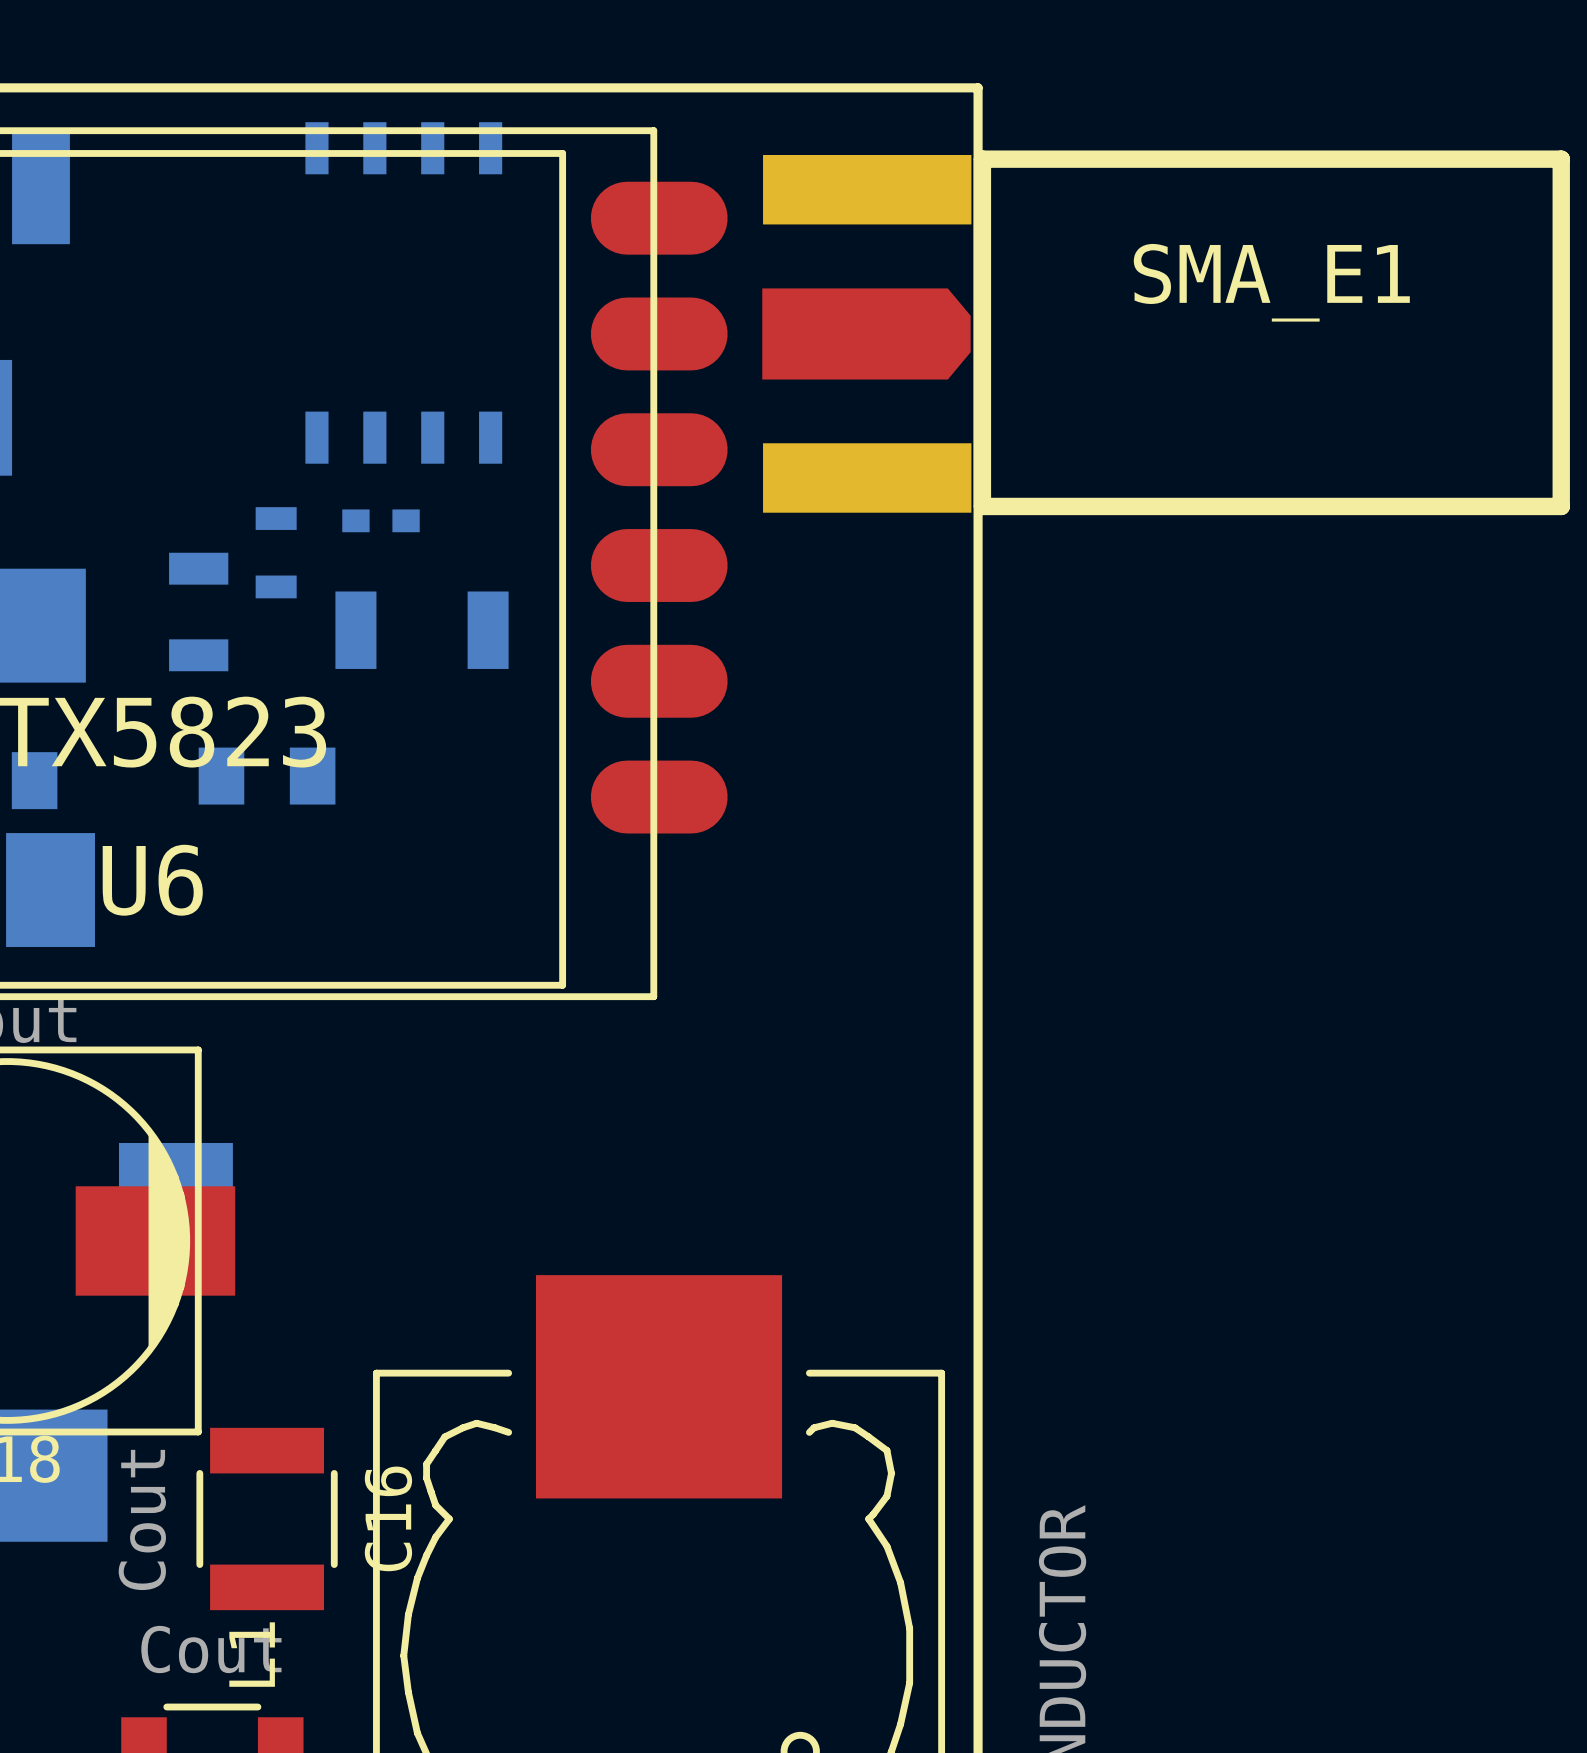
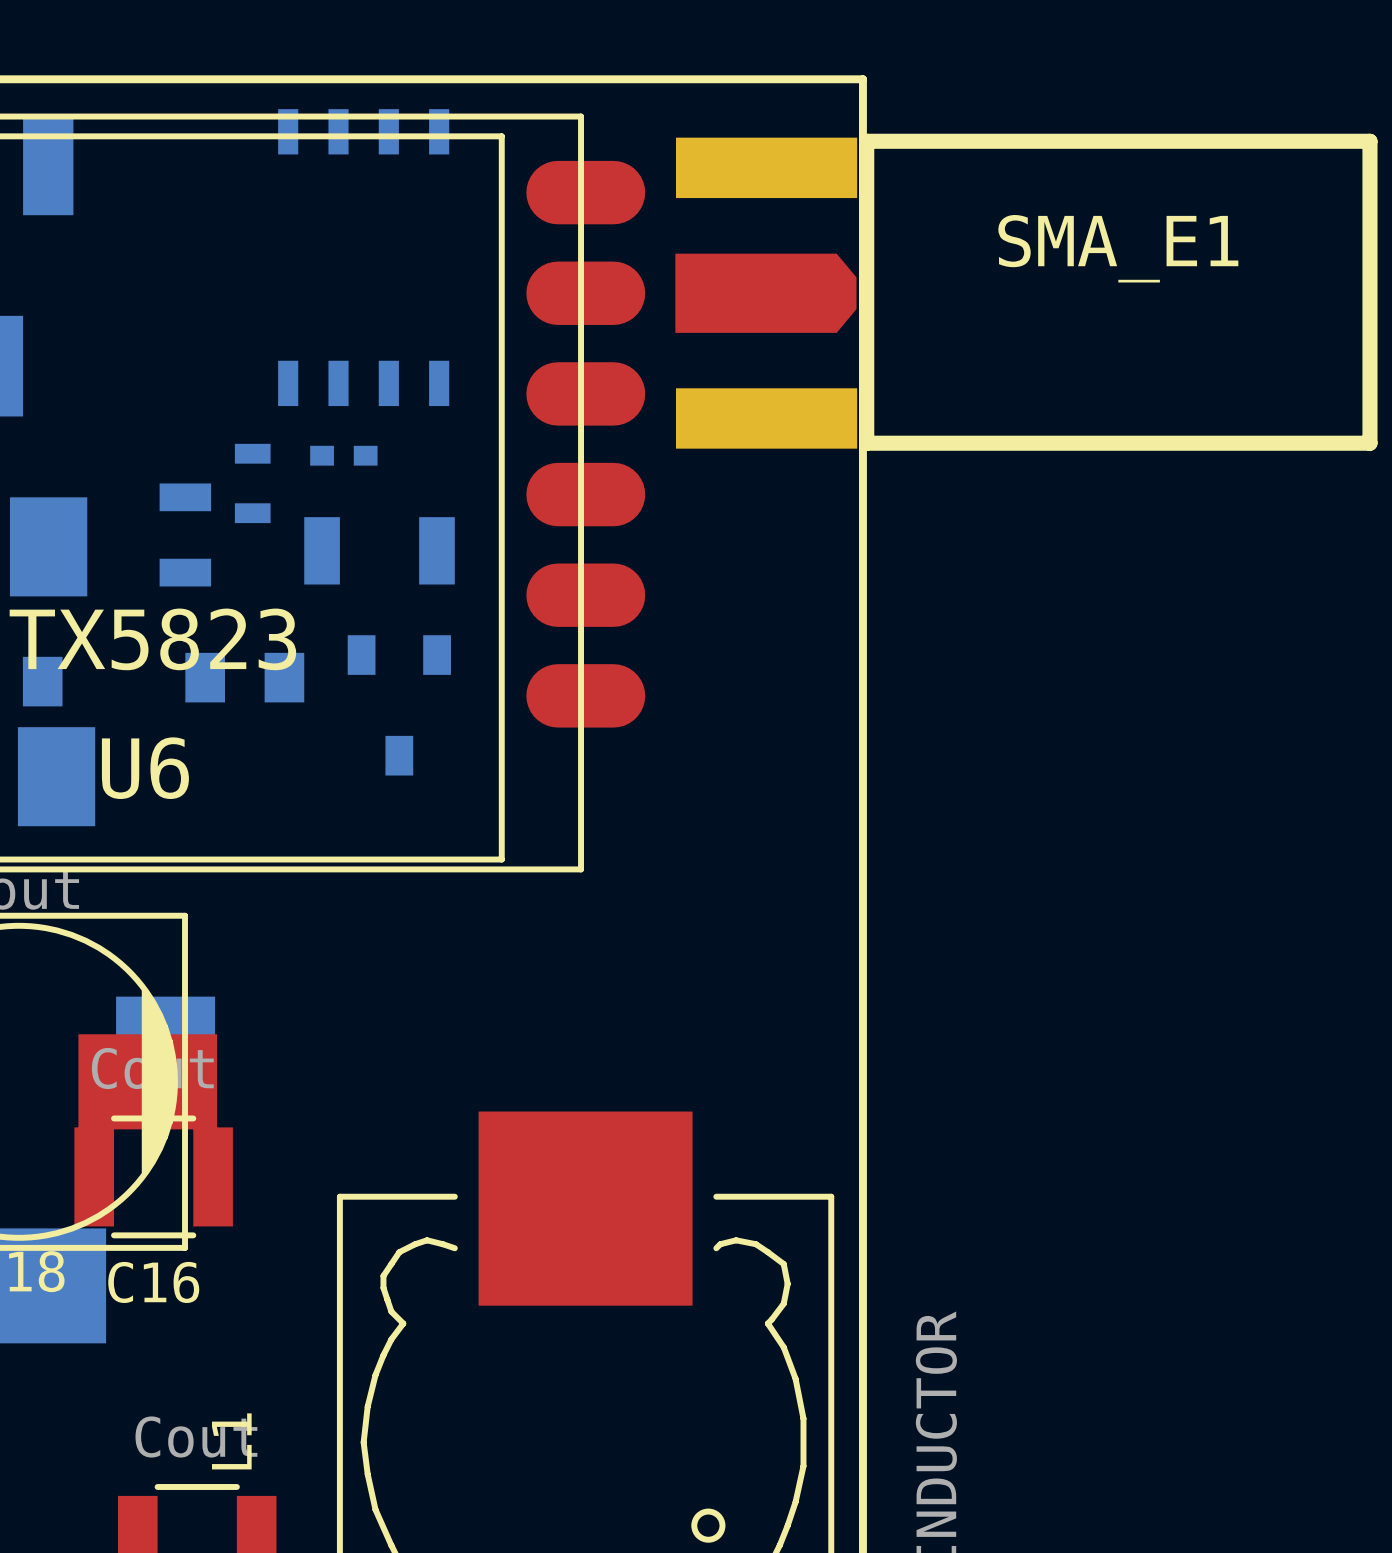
part: none -> (399, 705)
C16 rotation: 0° (267, 1518) -> 90° clockwise (153, 1176)
C16 position: (267, 1518) -> (153, 1176)

